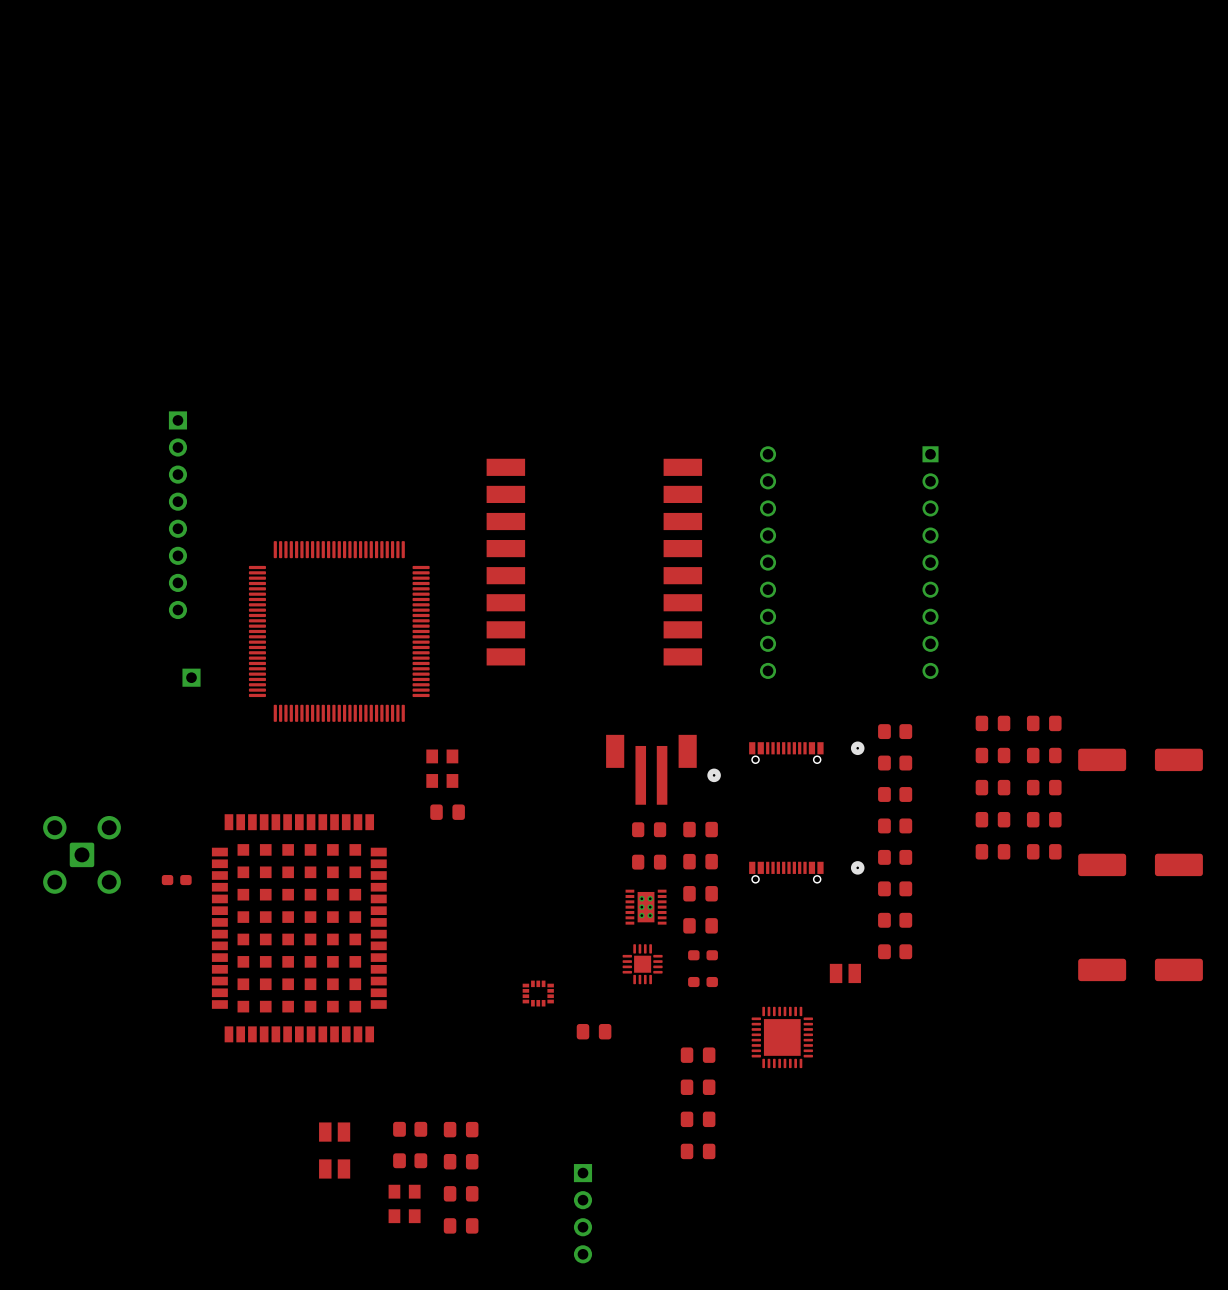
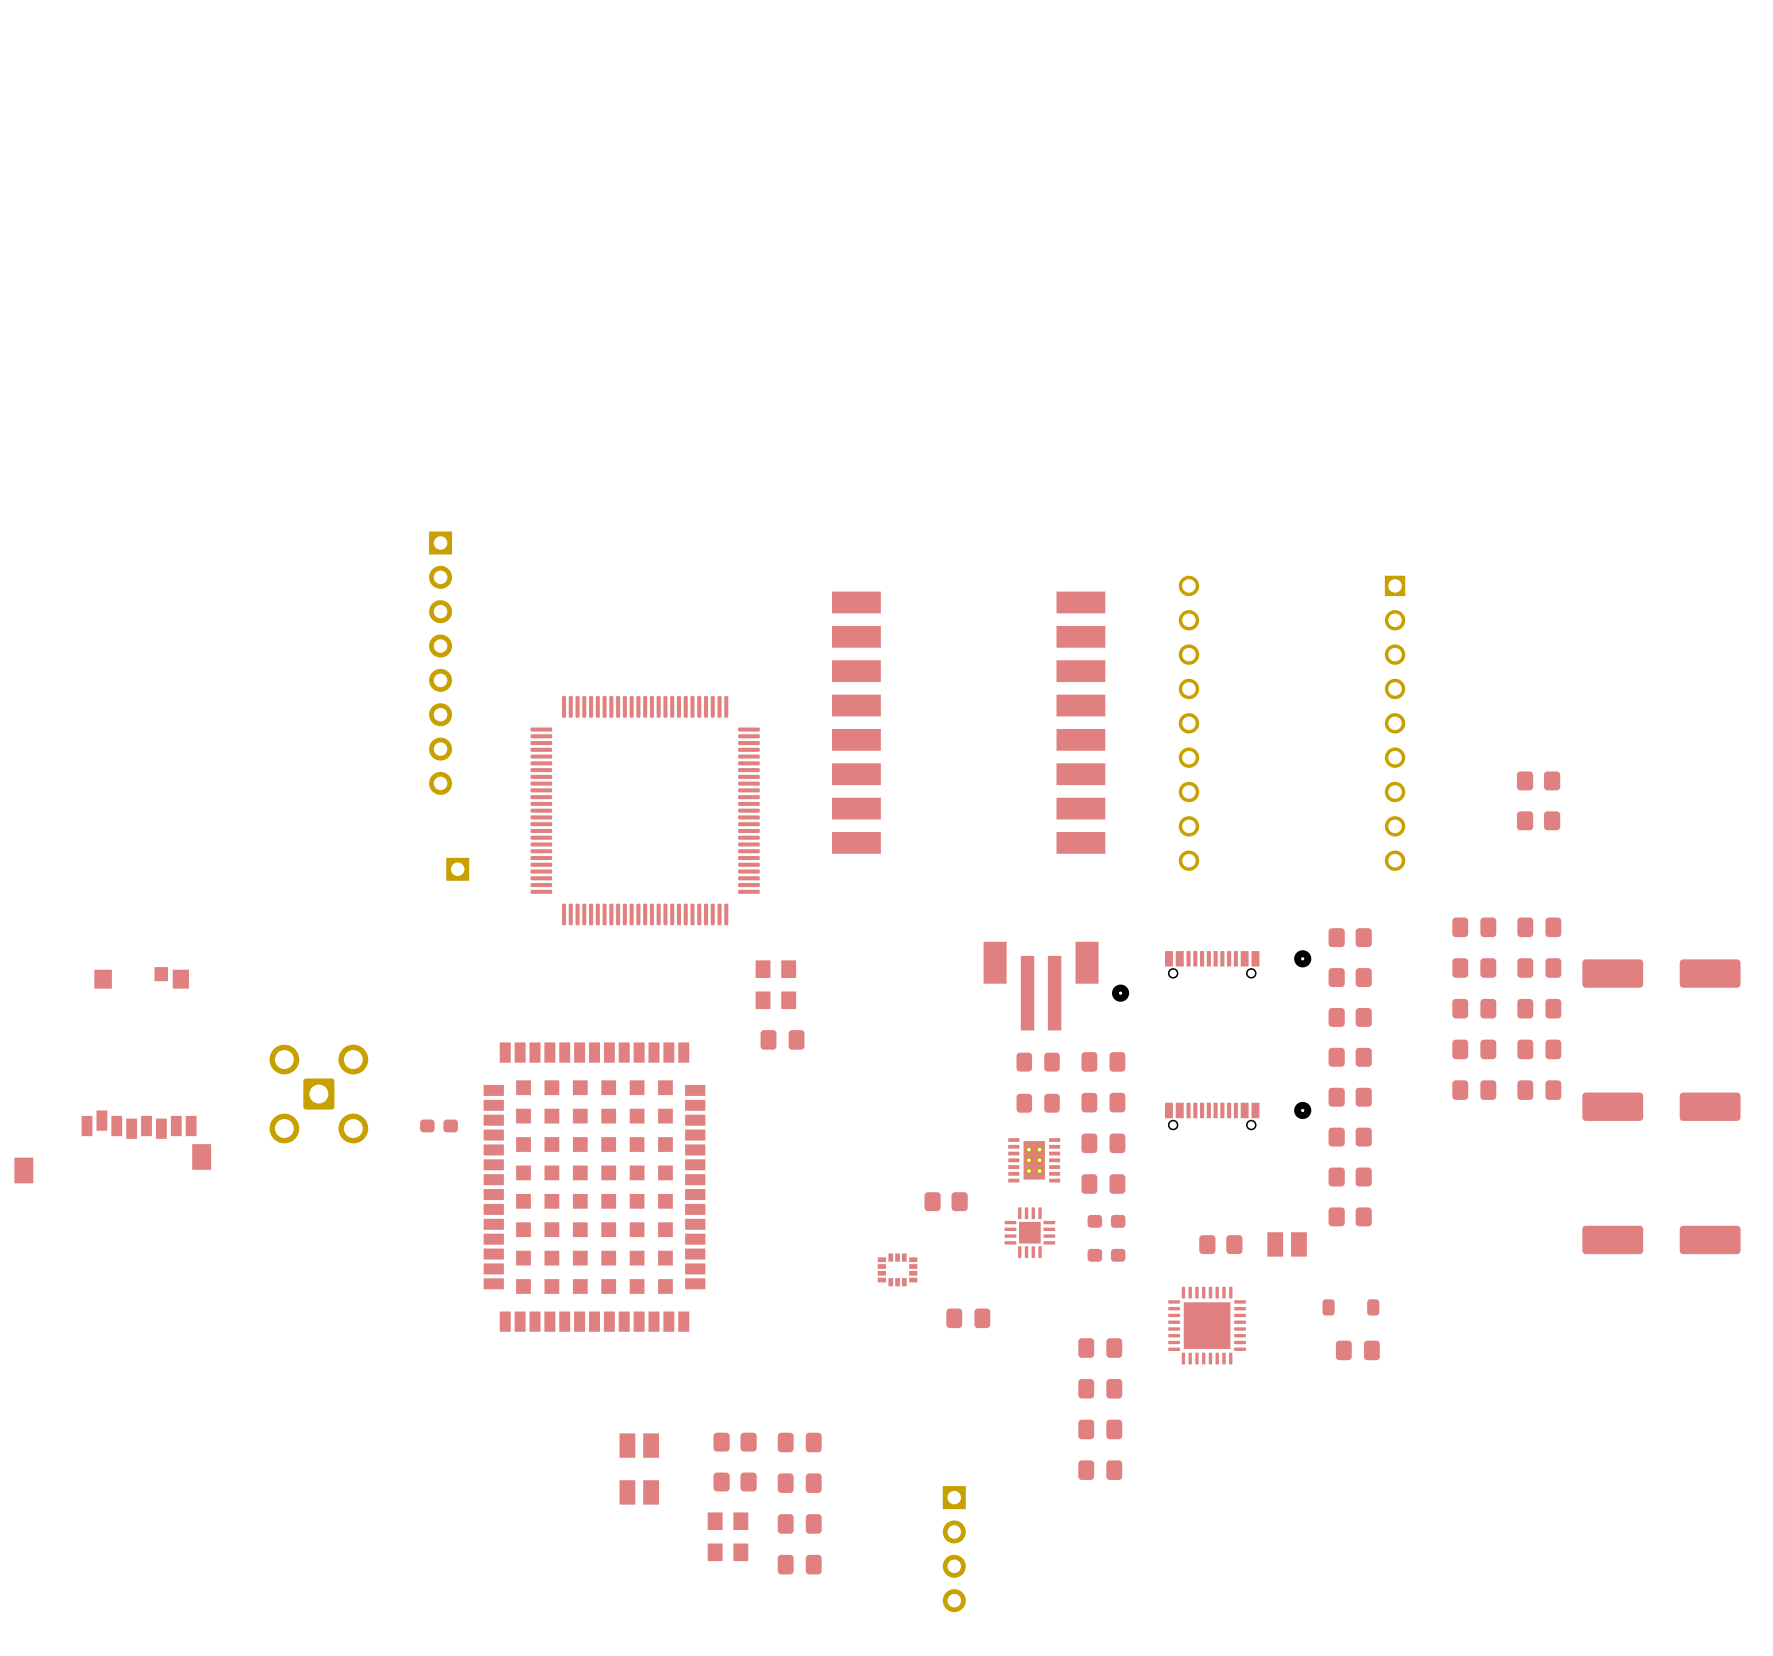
part: none -> (1538, 780)
part: none -> (1538, 820)
part: none -> (946, 1201)
part: none -> (1220, 1244)
part: none -> (1350, 1307)
part: none -> (1357, 1350)

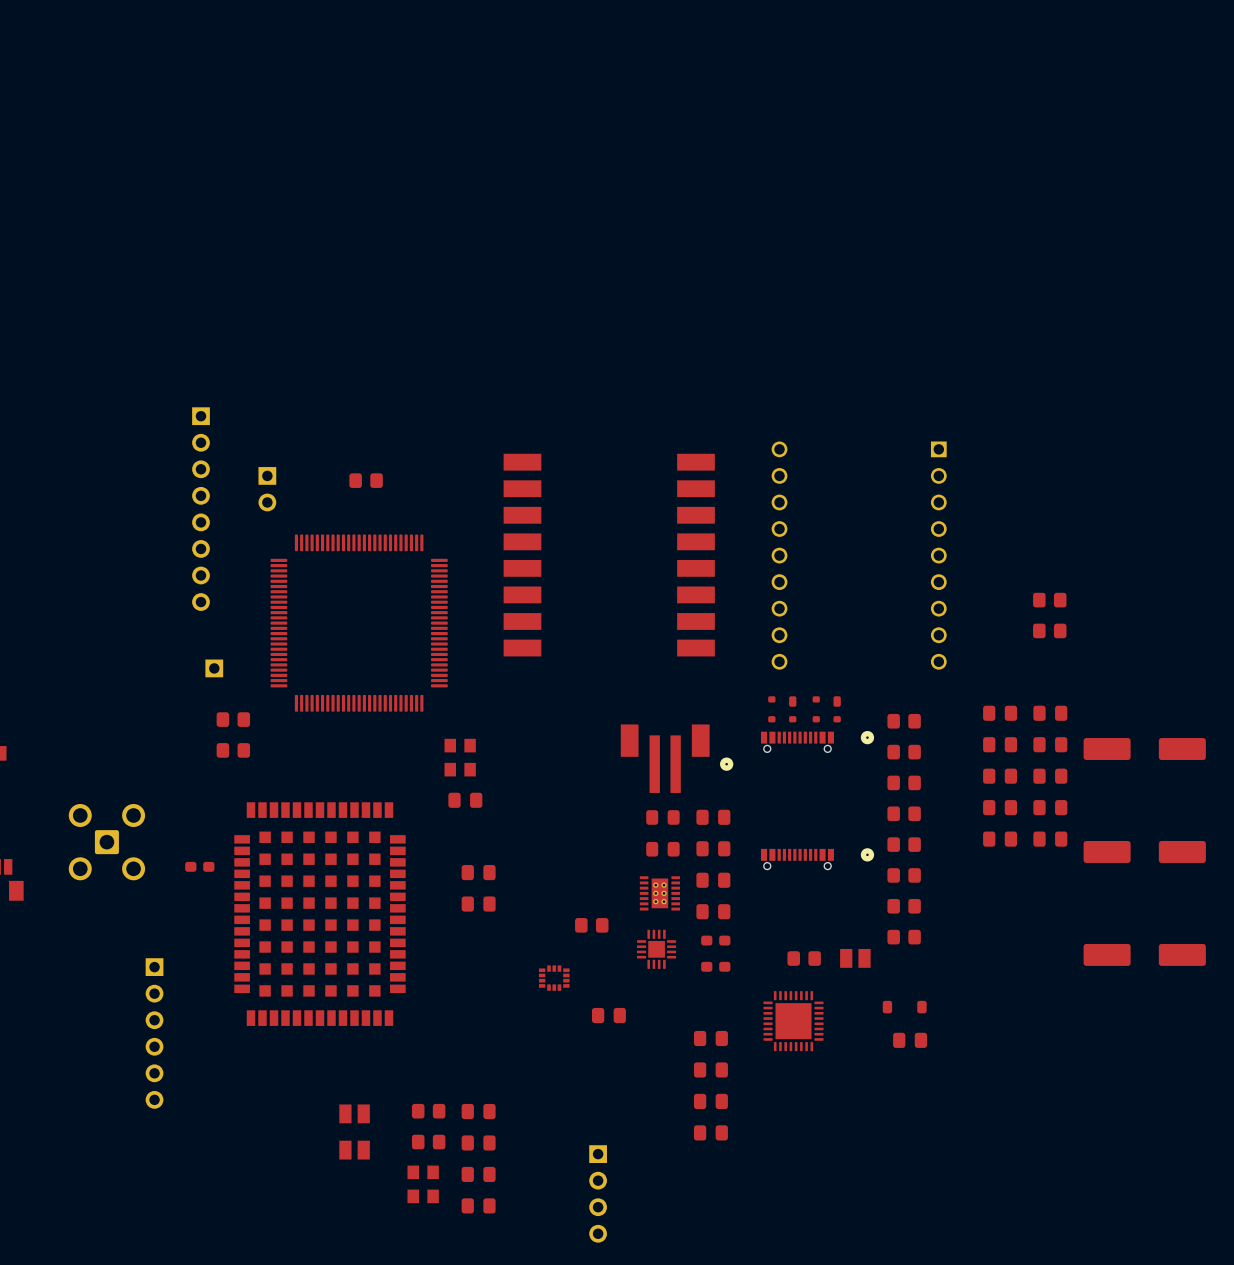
part: none -> (366, 480)
part: none -> (267, 489)
part: none -> (782, 709)
part: none -> (826, 709)
part: none -> (233, 719)
part: none -> (233, 750)
part: none -> (478, 872)
part: none -> (478, 904)
part: none -> (154, 1033)

